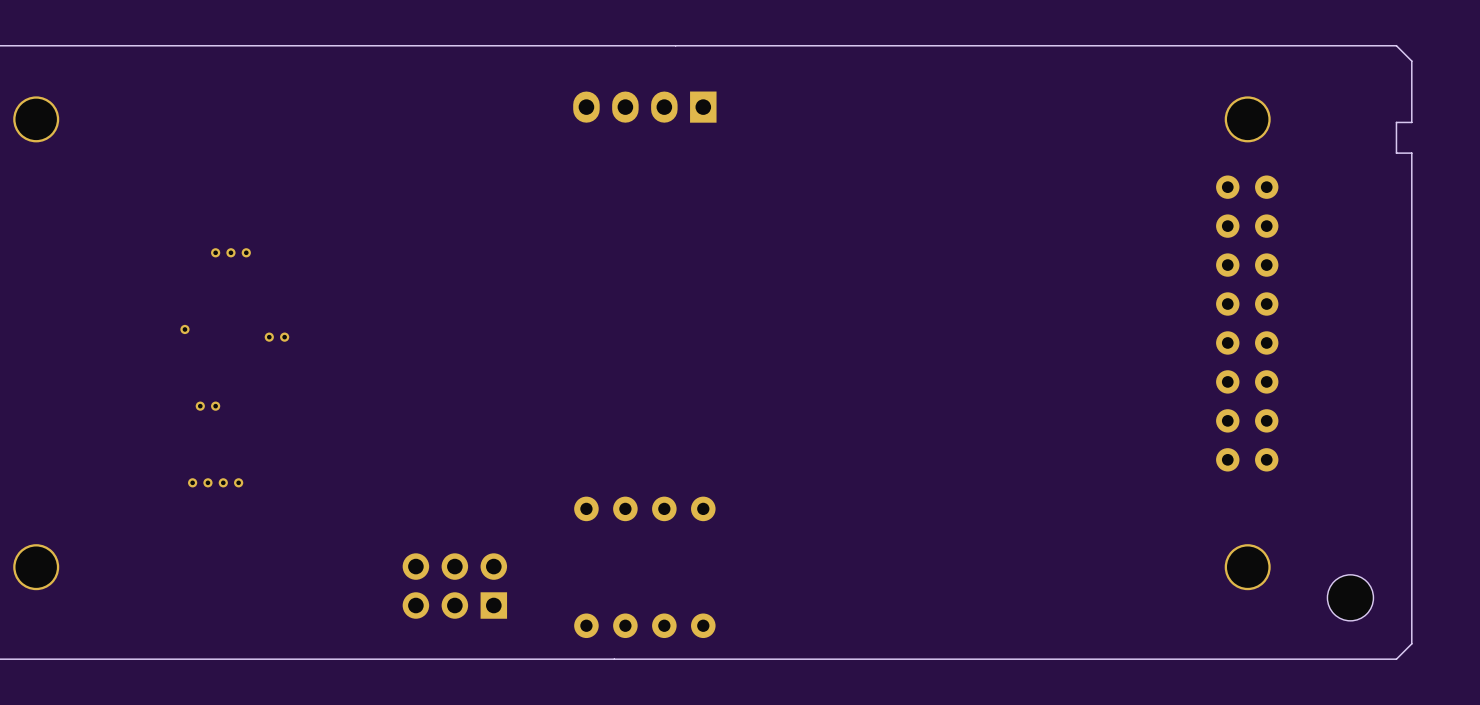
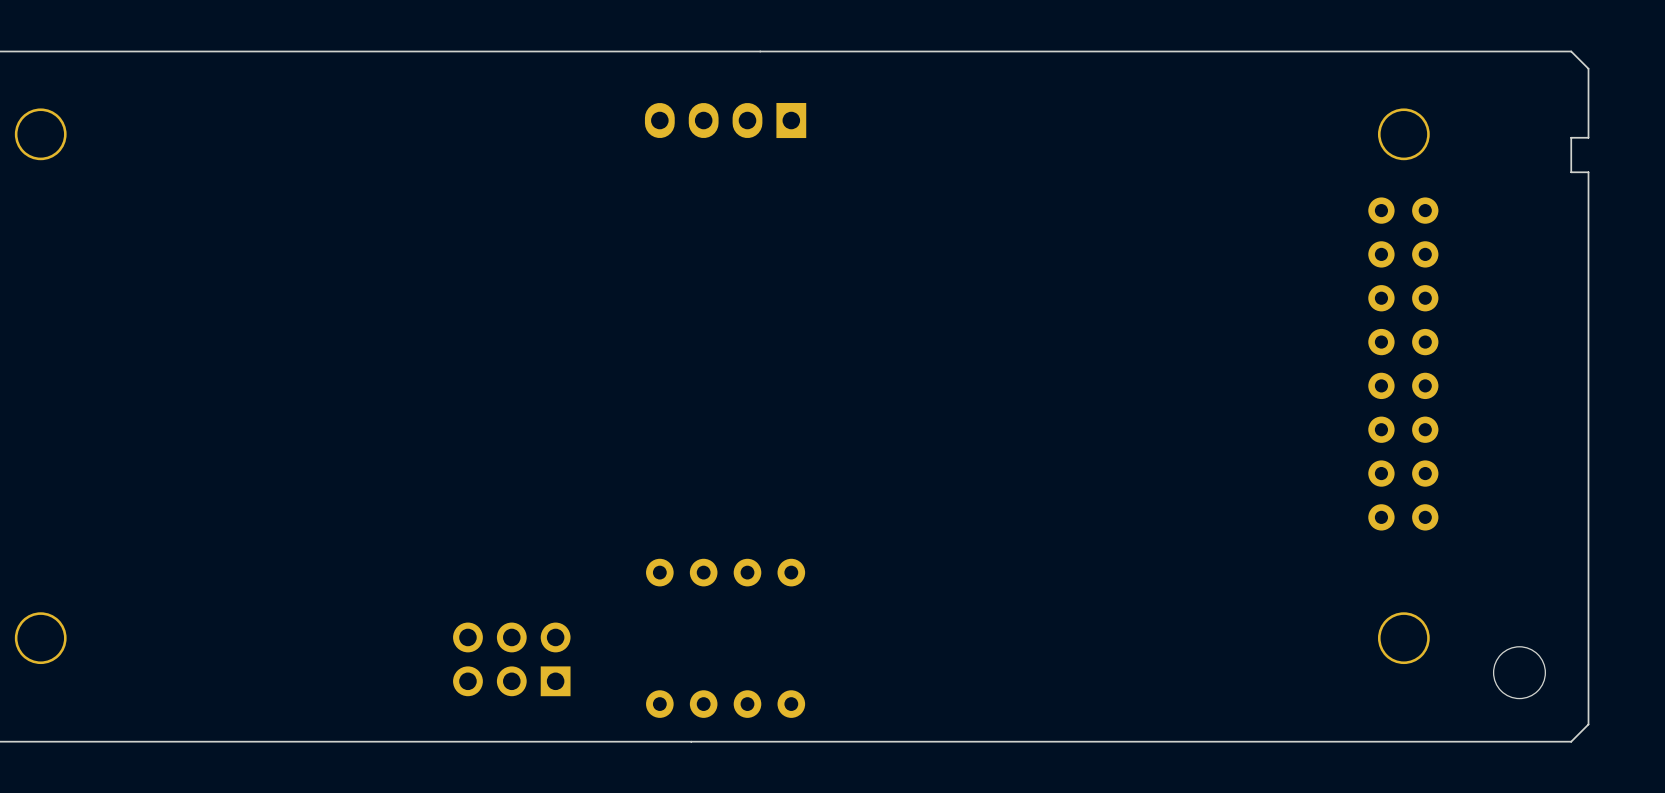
part: (215, 252) -> none
part: (230, 252) -> none
part: (246, 252) -> none
part: (184, 329) -> none
part: (269, 337) -> none
part: (284, 337) -> none
part: (200, 406) -> none
part: (215, 406) -> none
part: (192, 482) -> none
part: (207, 482) -> none
part: (223, 482) -> none
part: (238, 482) -> none

